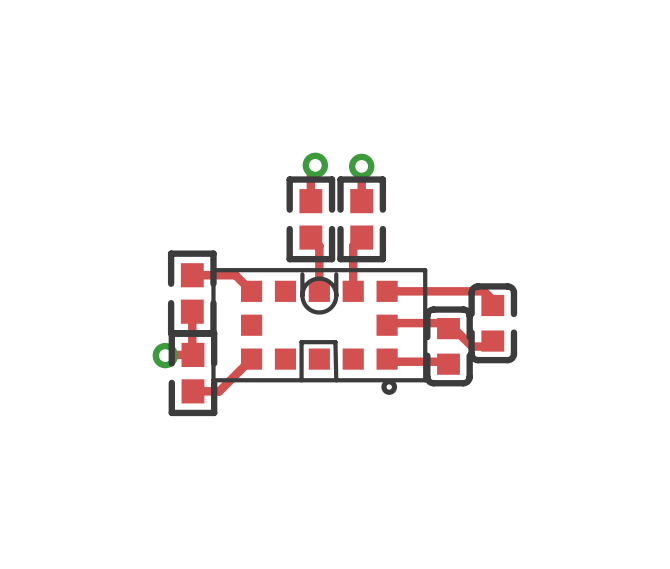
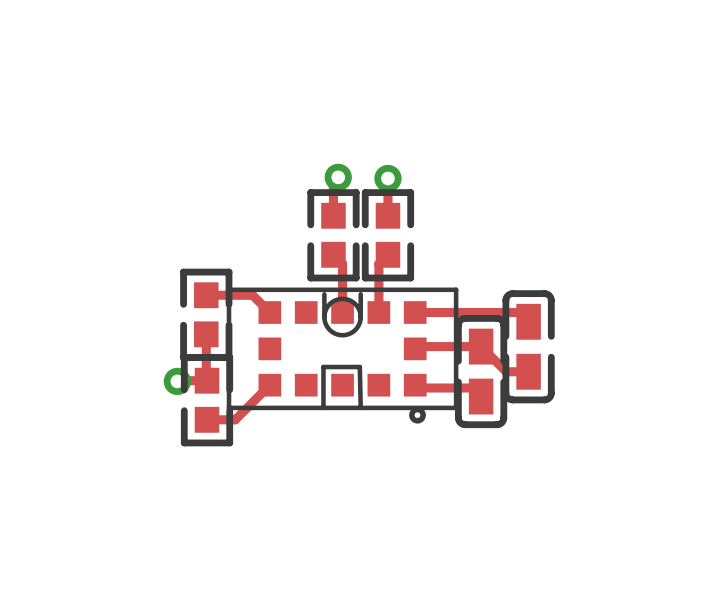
part footprint: [468, 283, 518, 364] -> [502, 290, 555, 404]
part footprint: [424, 306, 473, 387] -> [454, 315, 508, 429]

